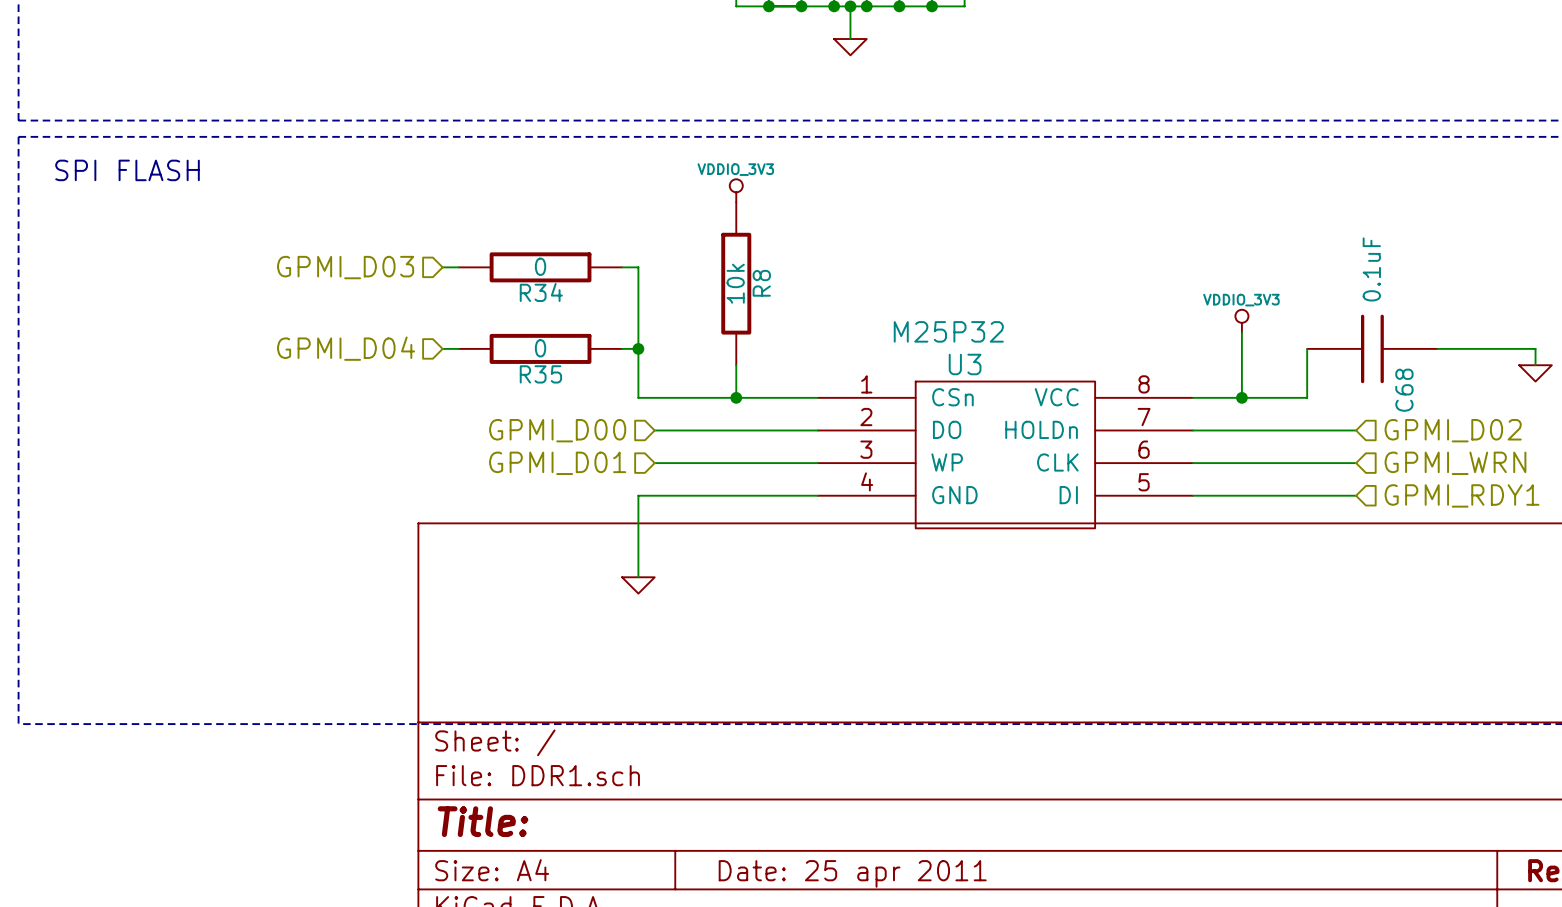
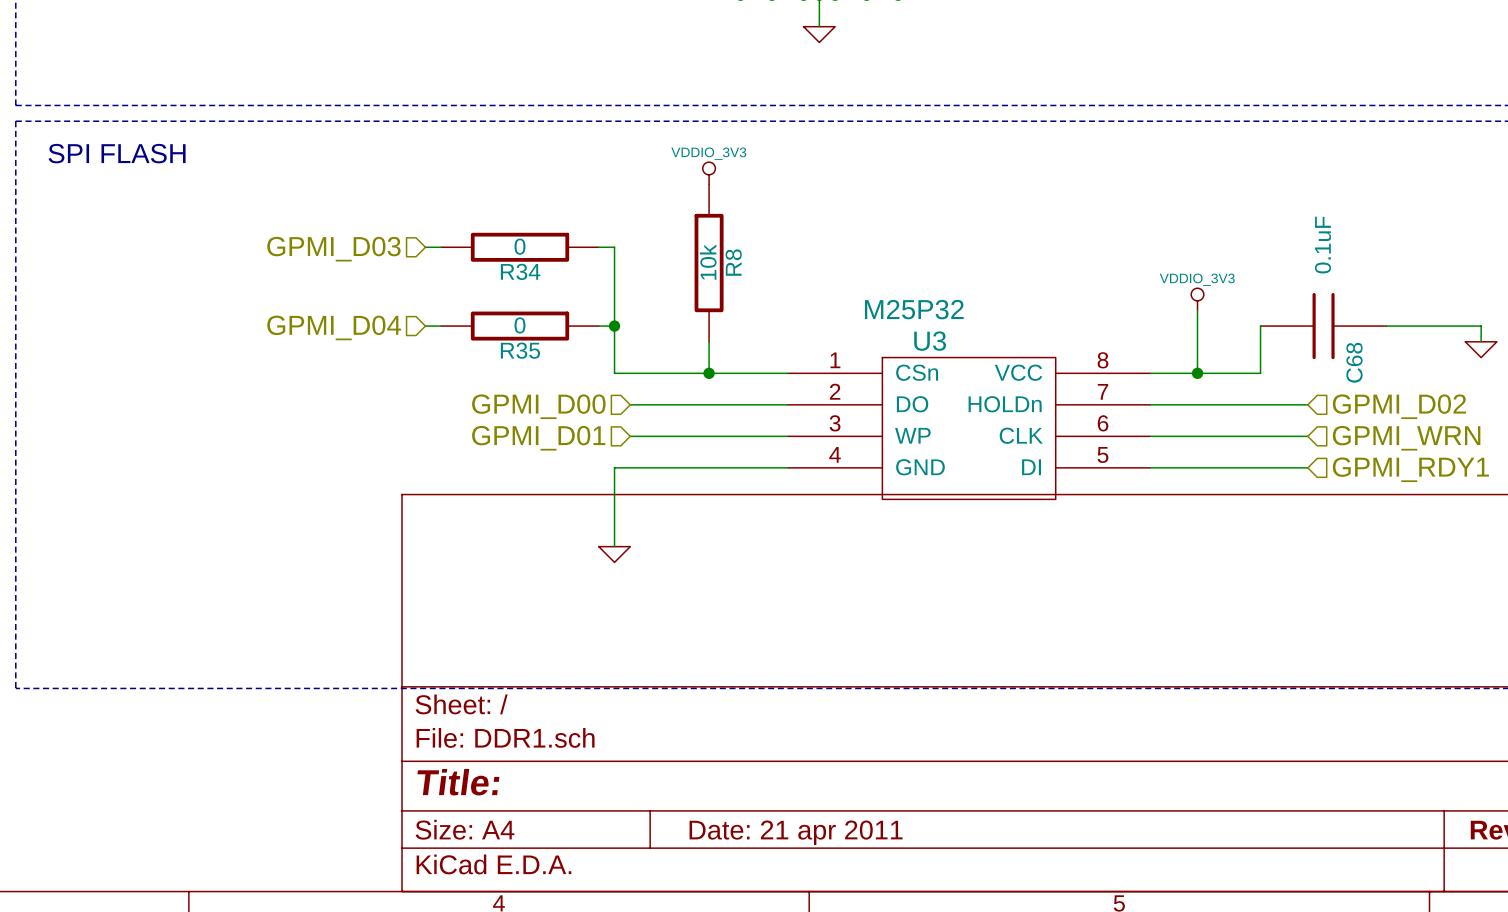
title block: Date: 25 apr 2011 (852, 873) -> Date: 21 apr 2011 (796, 832)

